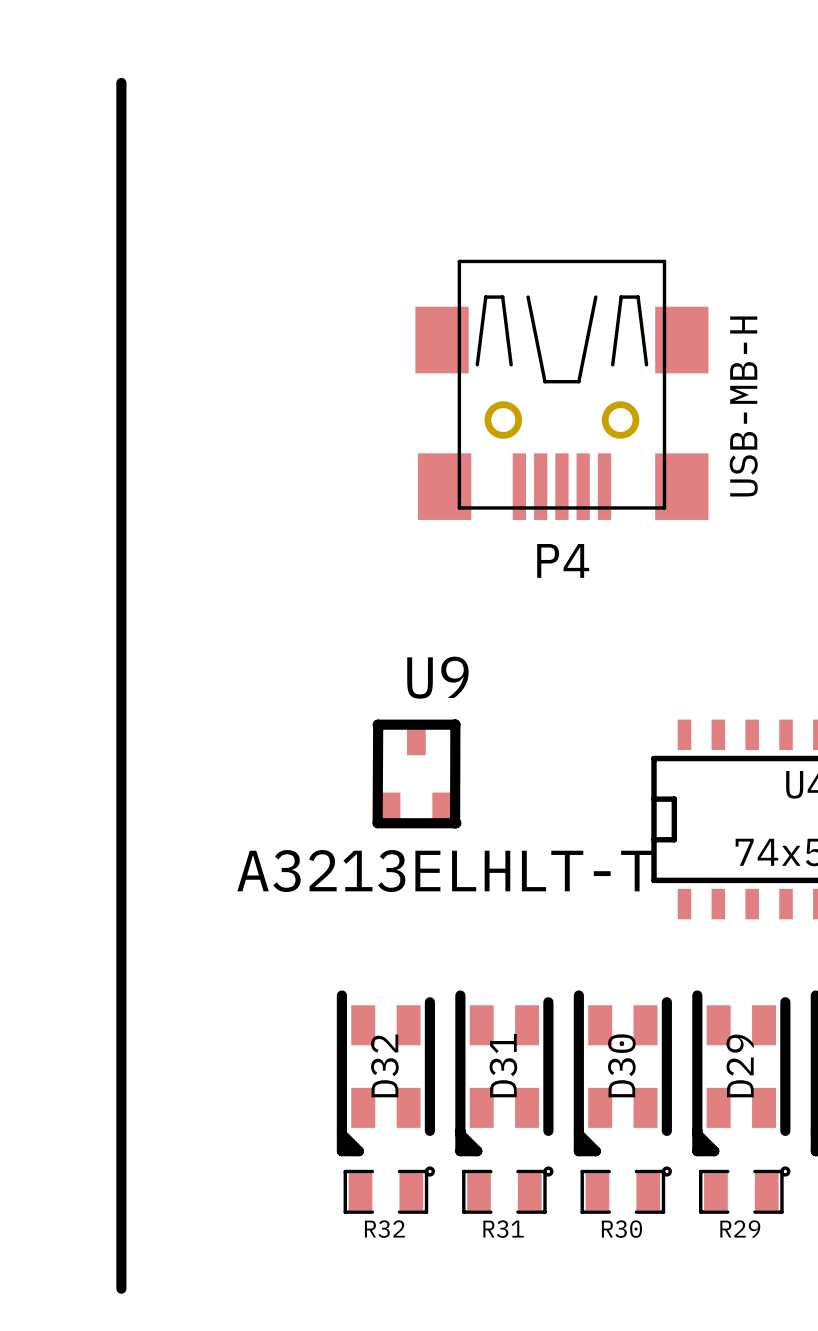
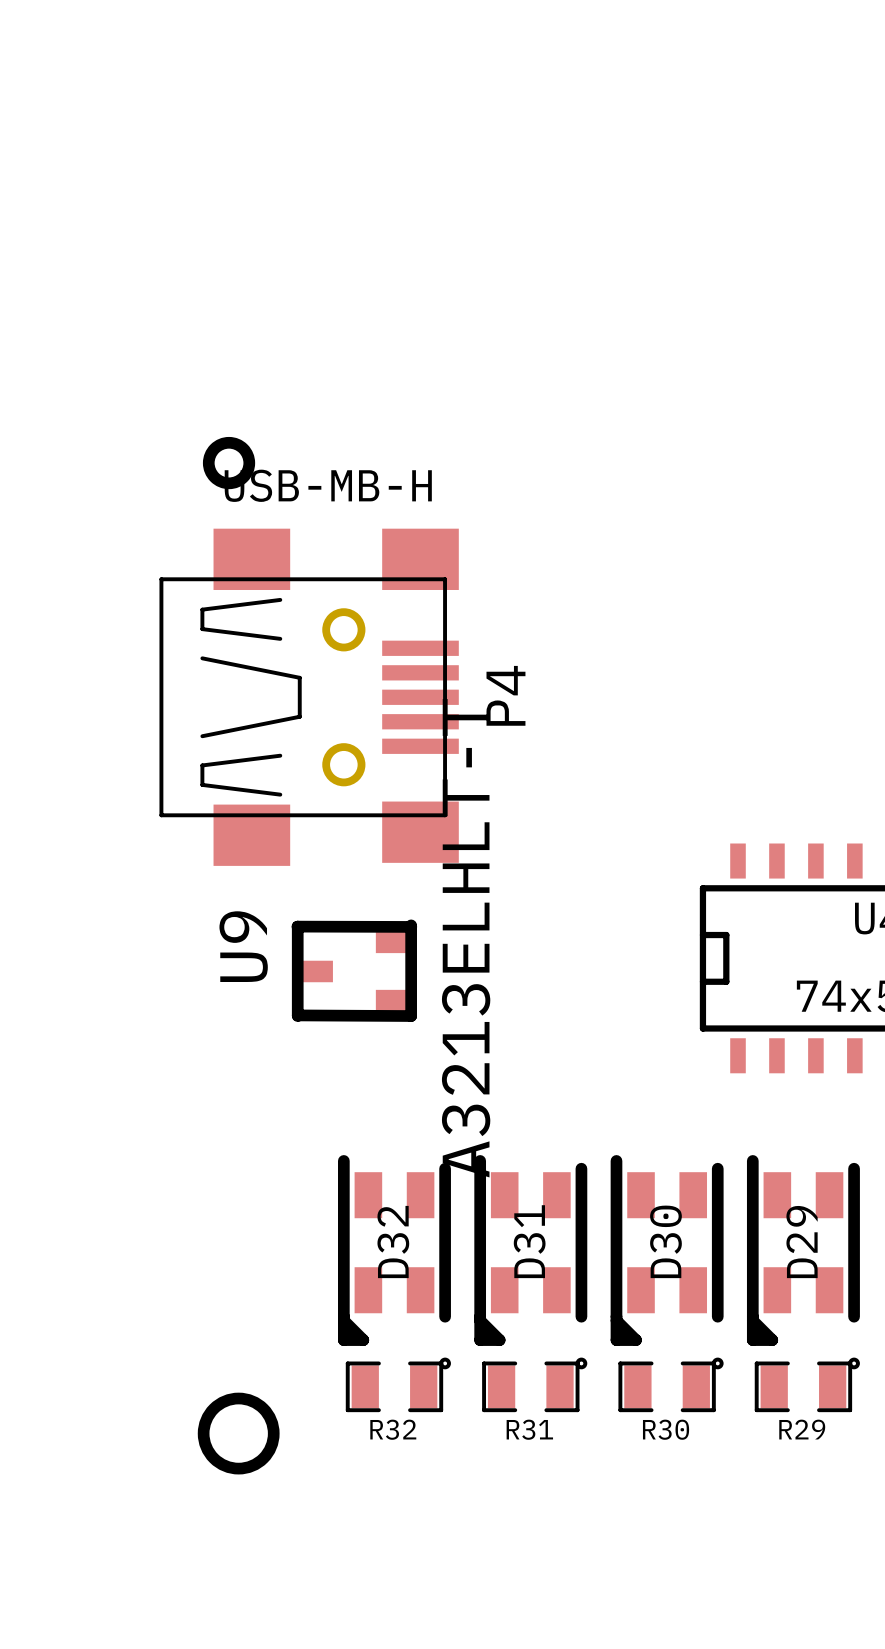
board edge: (121, 82) (121, 1288) -> none
round board edge: none -> [202, 436, 256, 490]
P4 rotation: 0° (561, 389) -> 90° counterclockwise (309, 697)
P4 position: (561, 389) -> (309, 697)
U9 rotation: 0° (417, 773) -> 90° counterclockwise (354, 970)
U9 position: (417, 773) -> (354, 970)
round board edge: none -> [197, 1392, 280, 1475]

